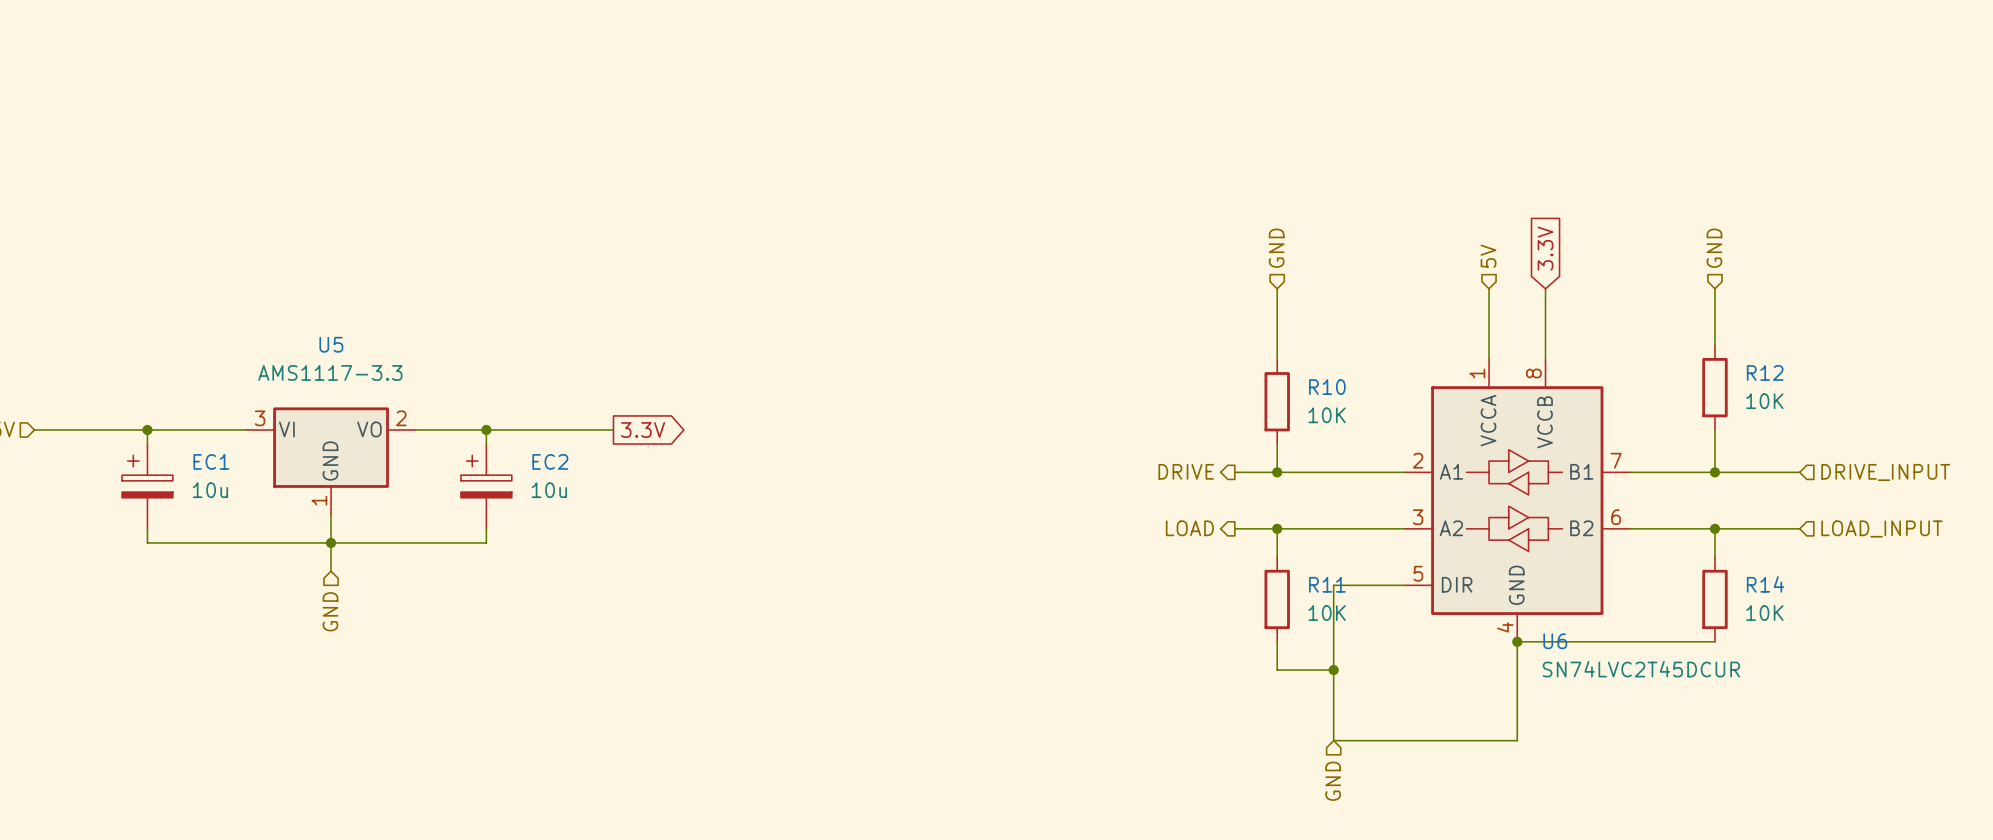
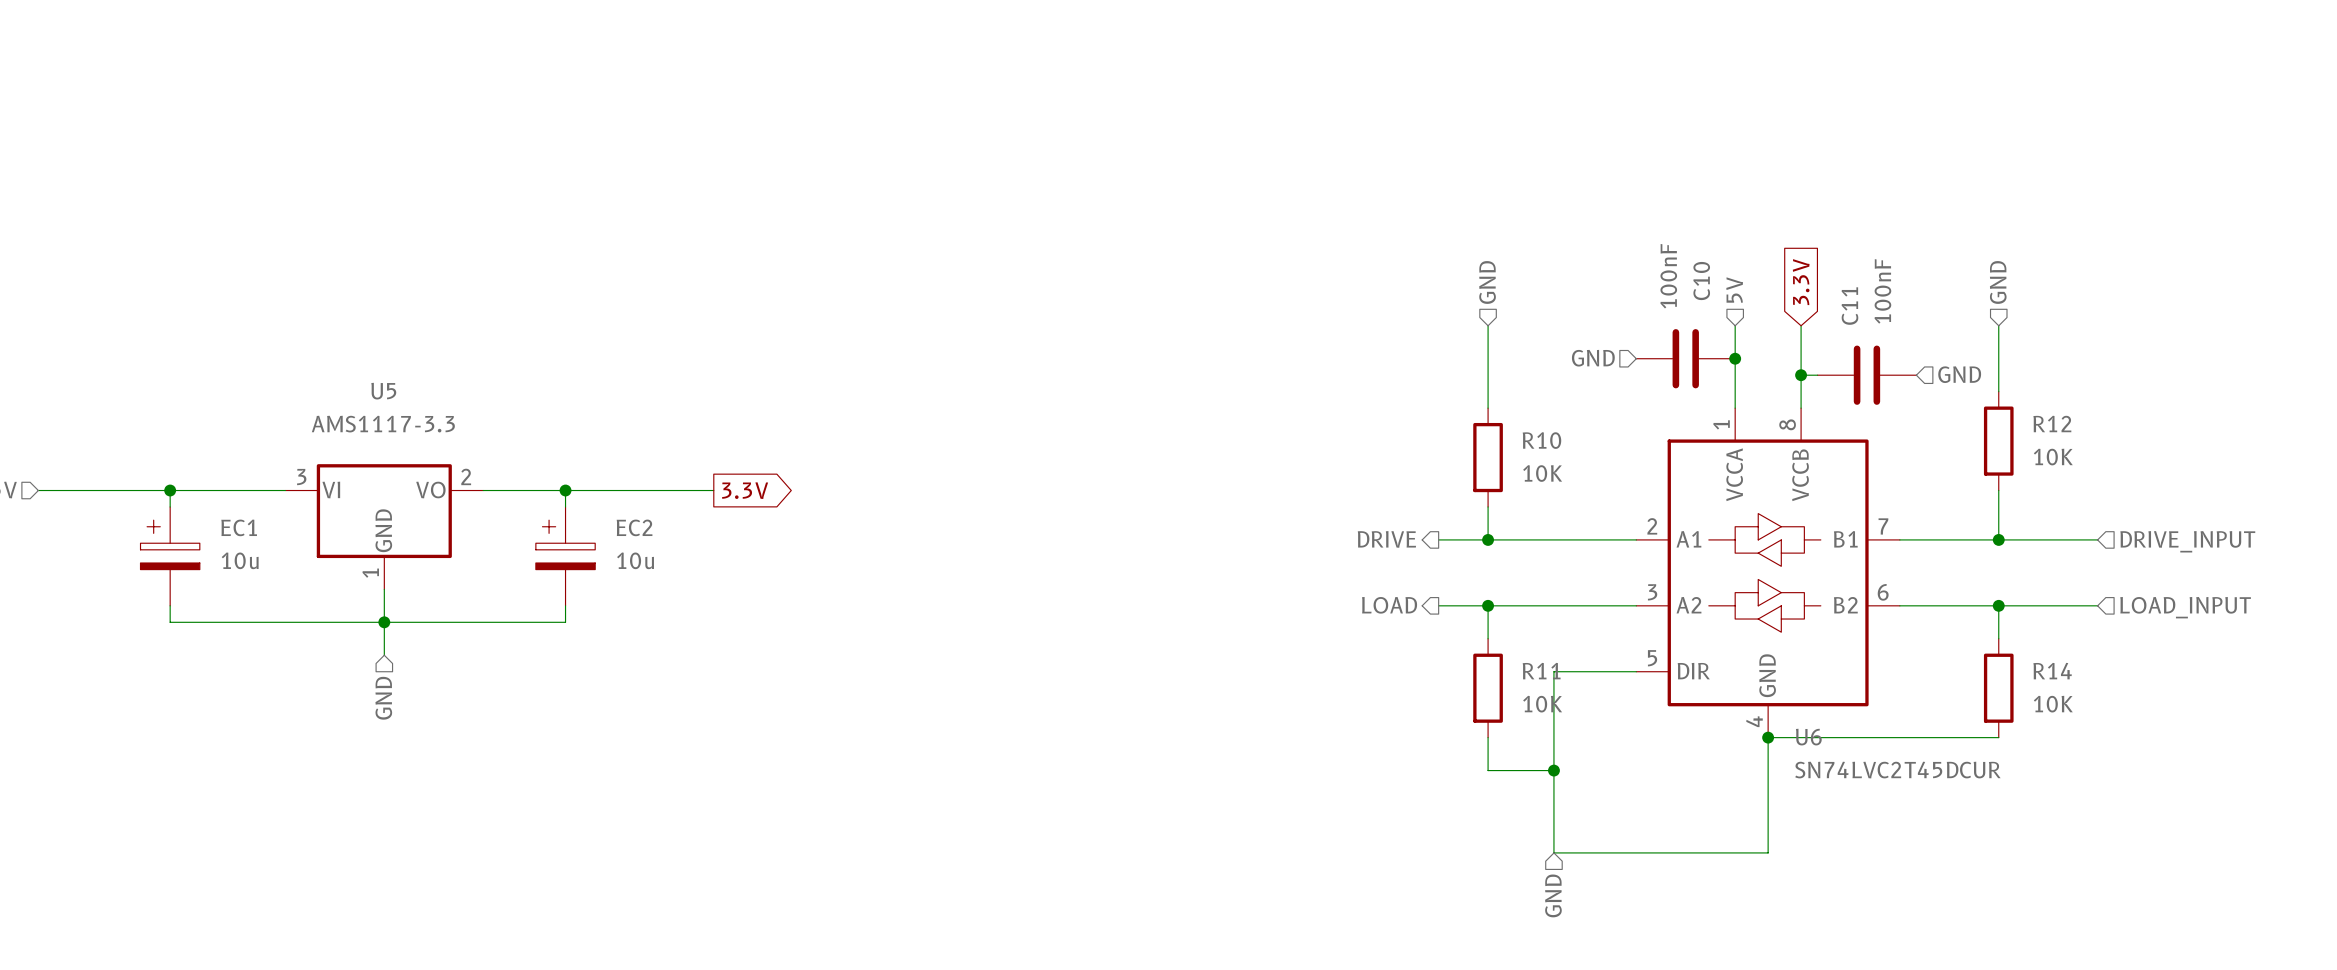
hierarchical label: none -> GND (1593, 358)
C10: none -> 100nF (1685, 358)
junction: none -> (1735, 358)
hierarchical label: none -> GND (1959, 374)
wire: none -> (1801, 375) (1817, 375)
junction: none -> (1801, 375)
C11: none -> 100nF (1866, 375)

